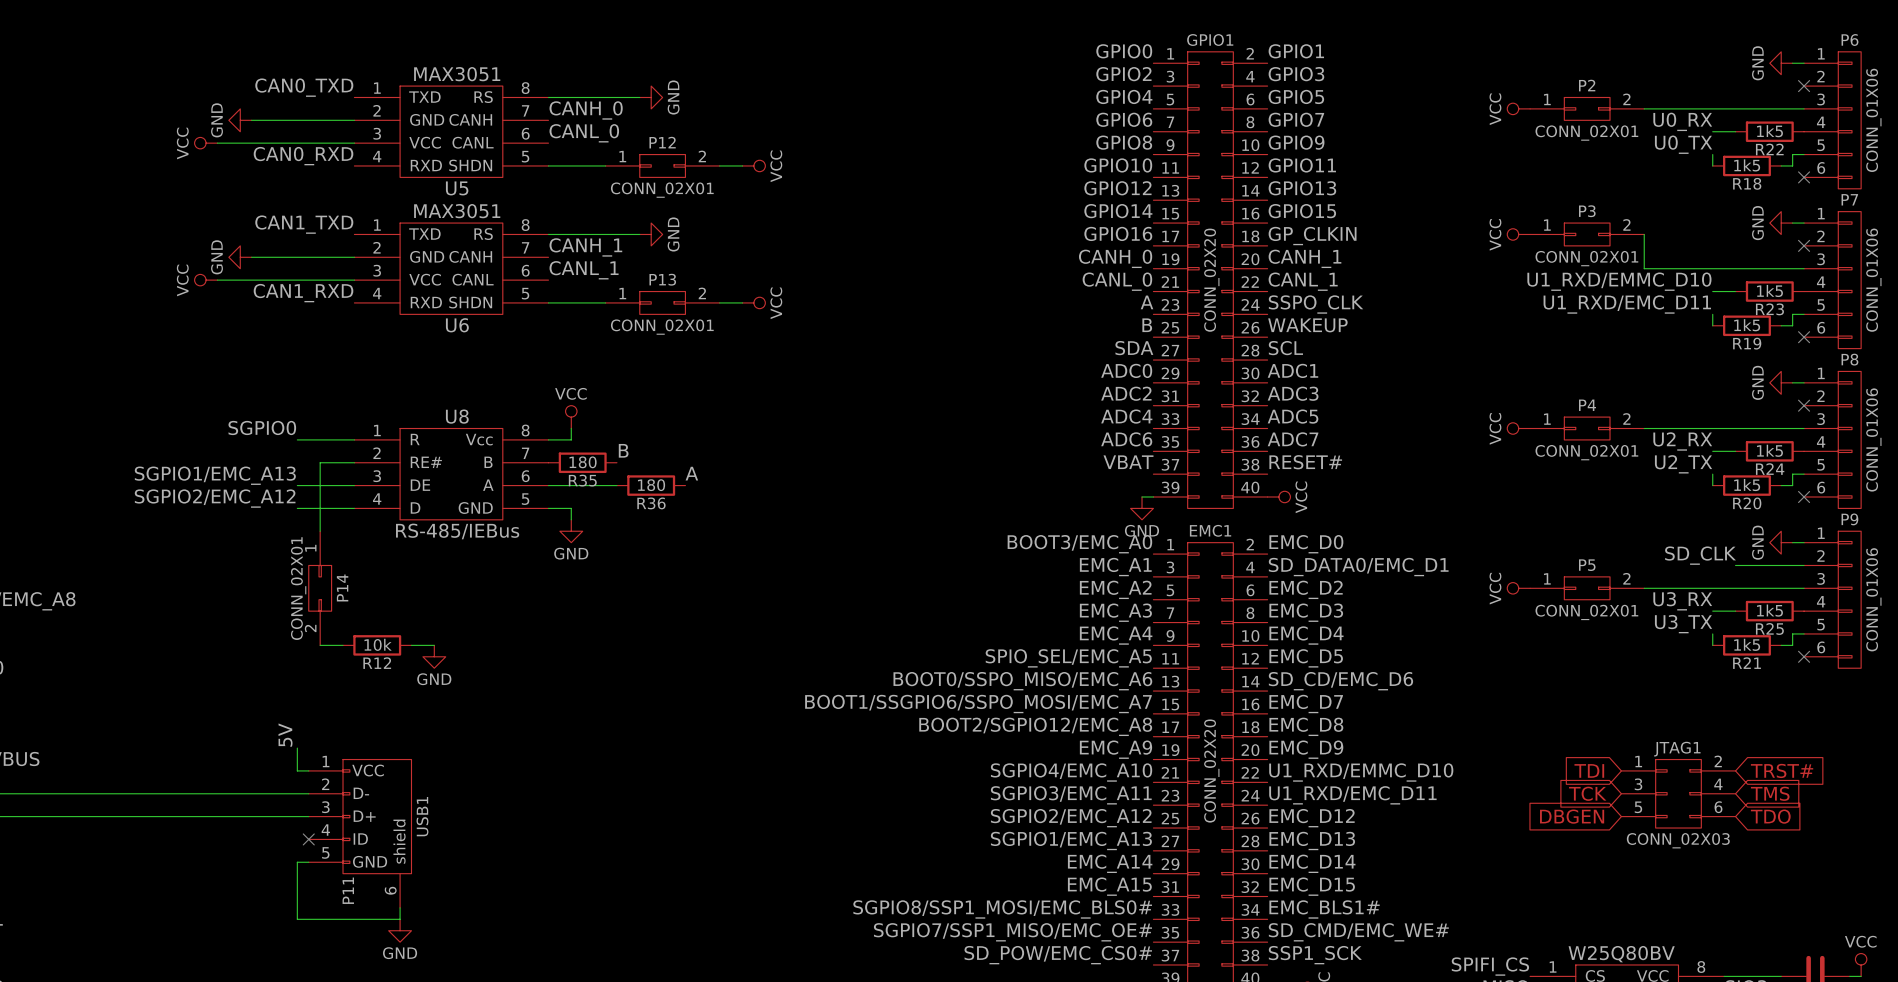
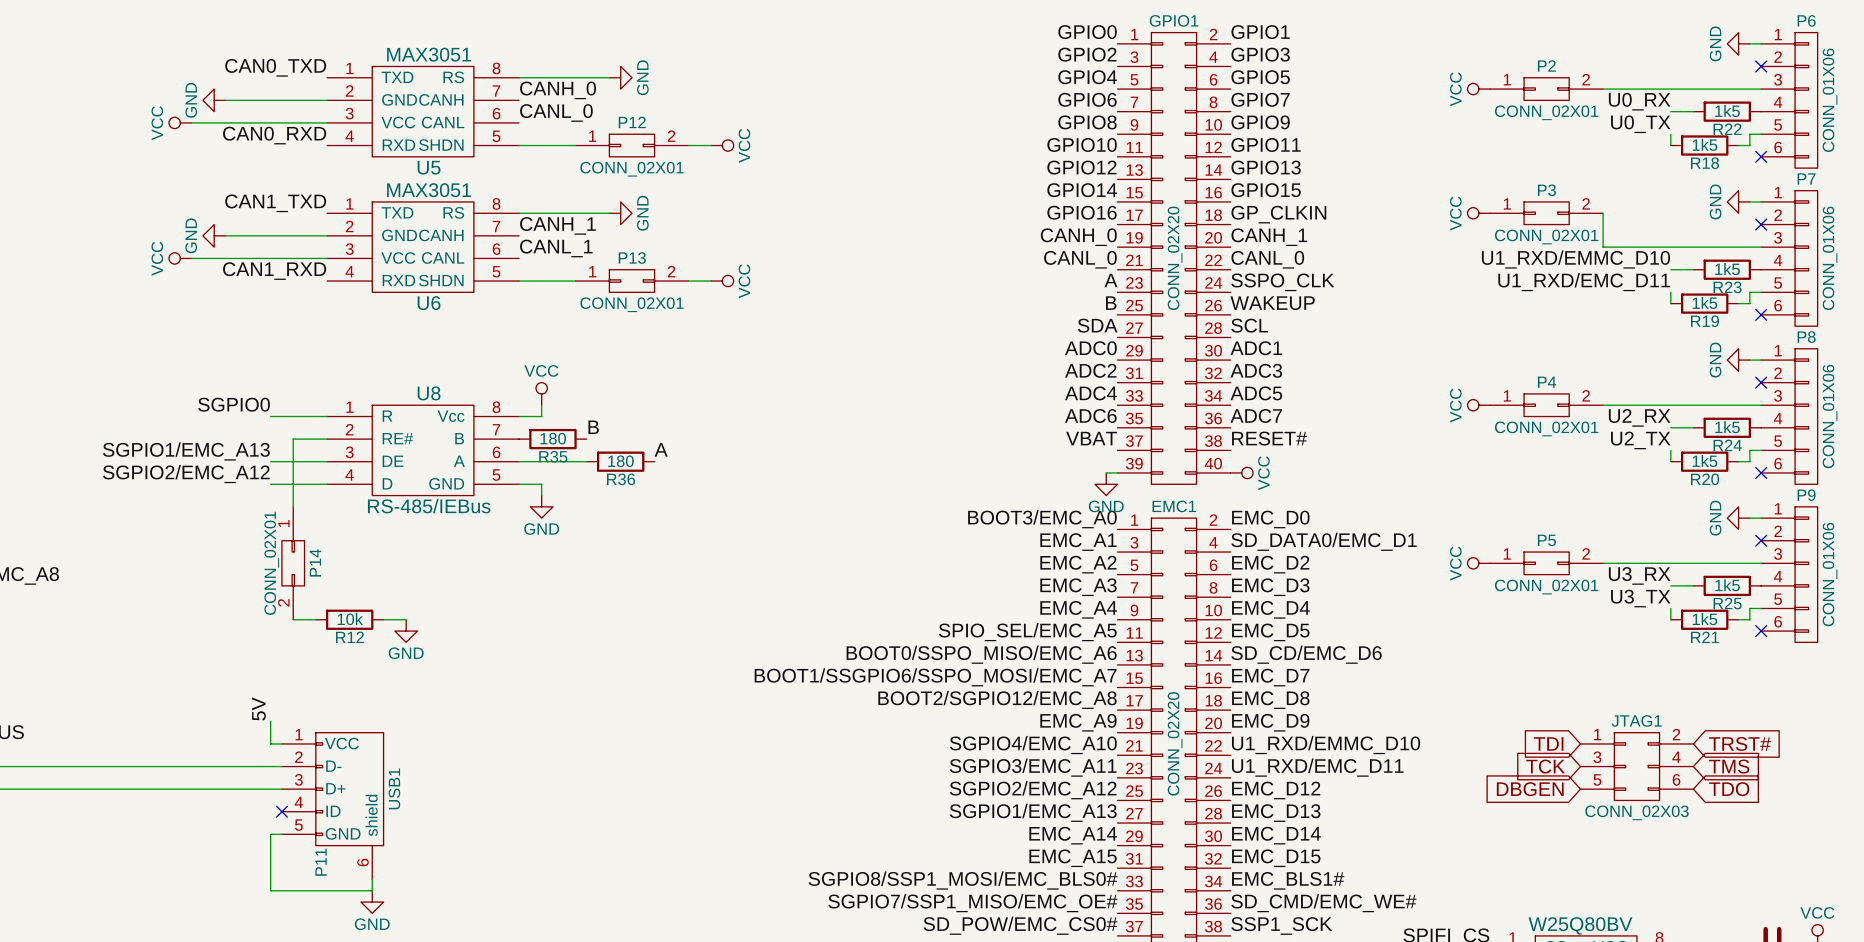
label: CANL_1 (1303, 281) -> CANL_0 (1267, 259)
label: SD_CLK (1700, 555) -> none
wire: (1735, 565) (1804, 565) -> none
no-connect mark: none -> (1761, 540)

